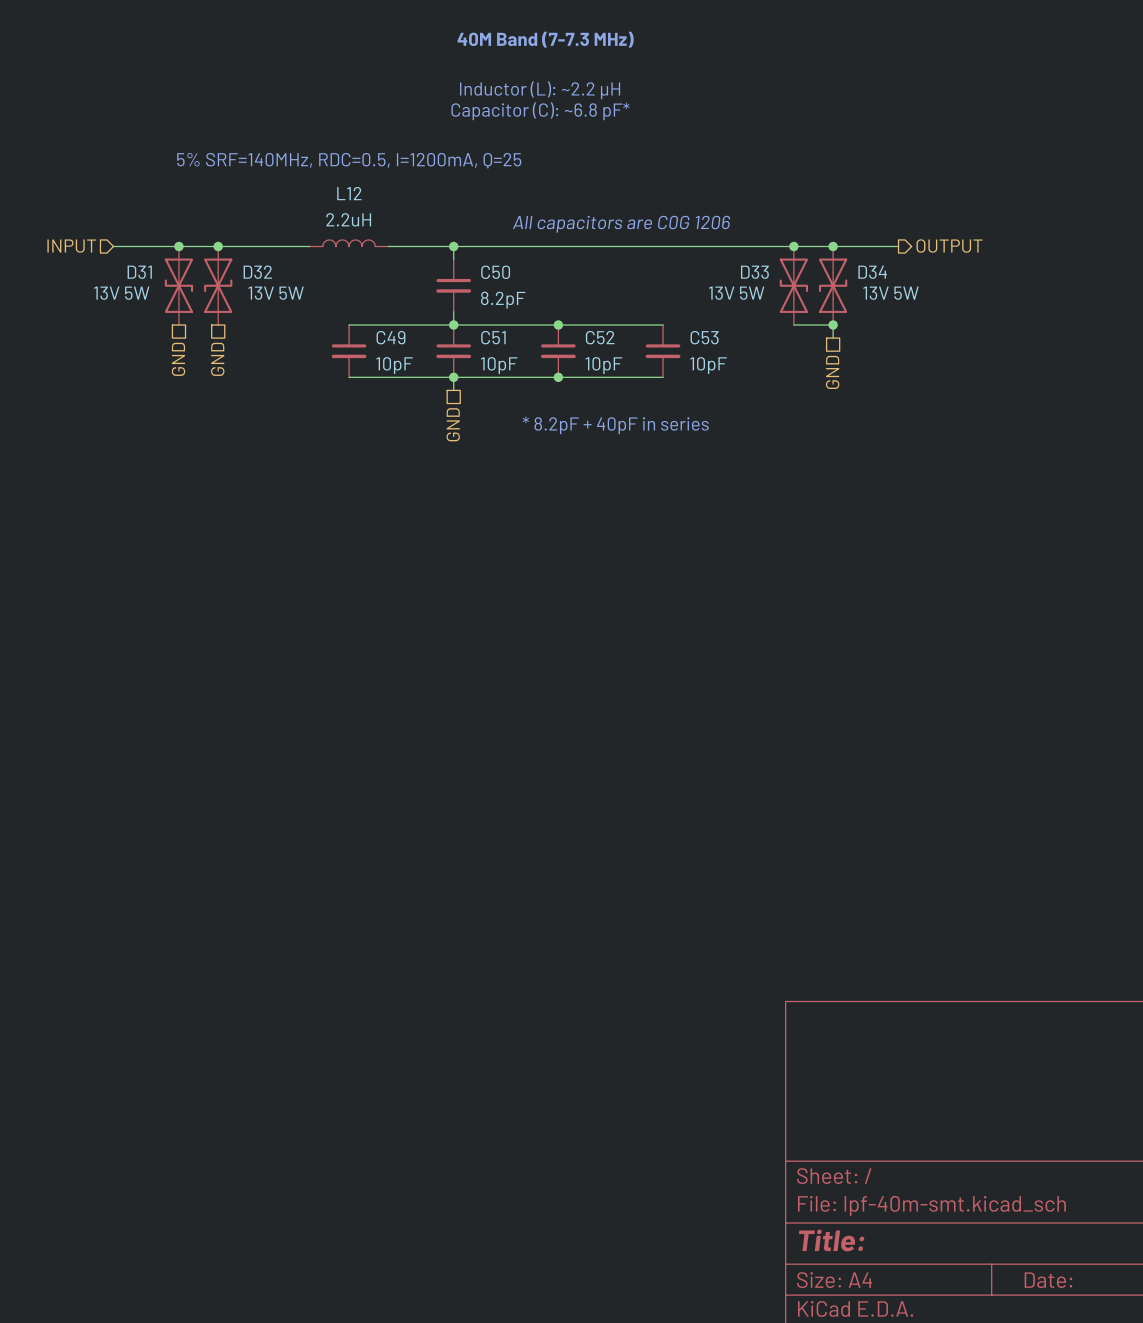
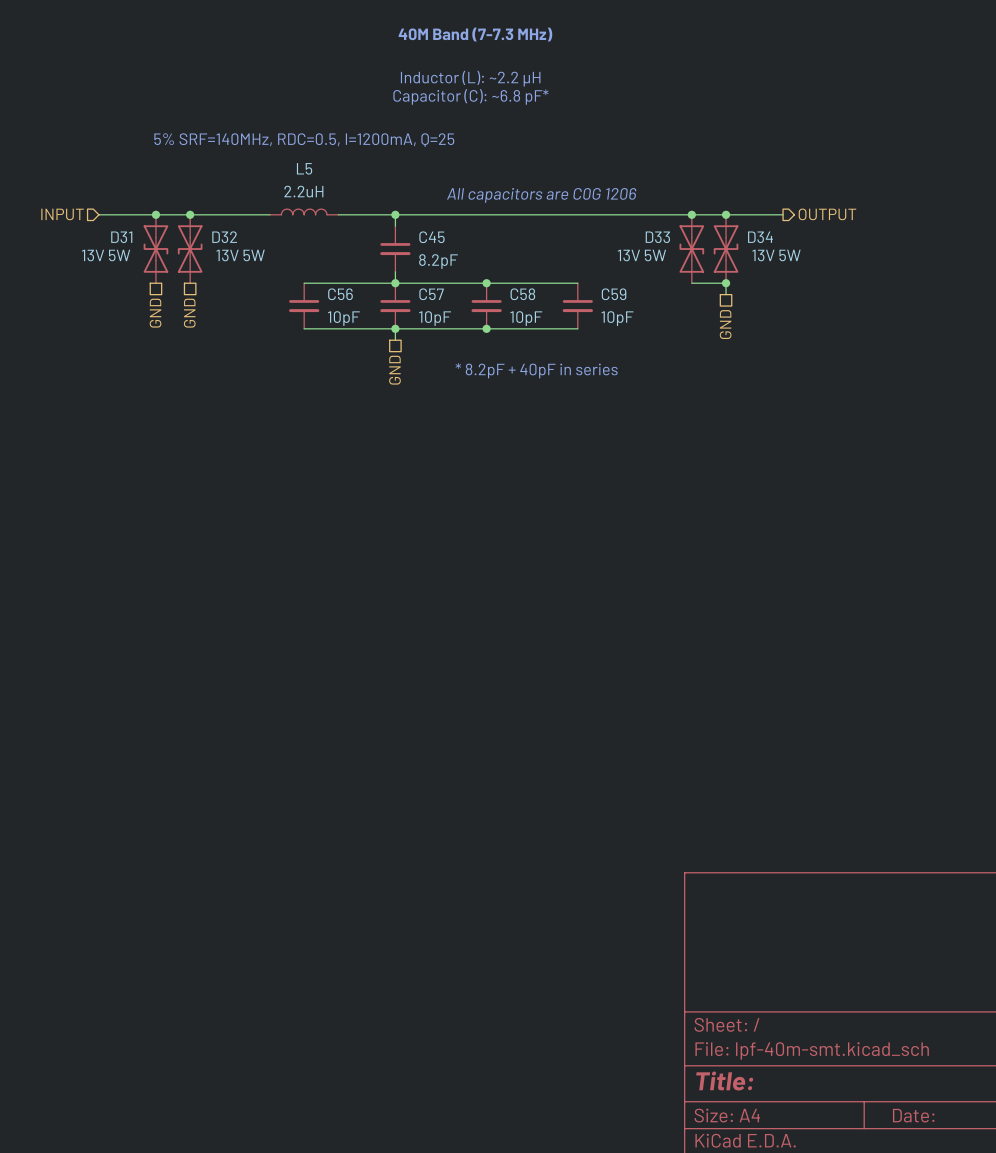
L12 name: L12 (349, 193) -> L5 (304, 168)
C50 name: C50 (495, 272) -> C45 (431, 237)
C49 name: C49 (390, 337) -> C56 (340, 294)
C51 name: C51 (493, 337) -> C57 (431, 294)
C52 name: C52 (600, 337) -> C58 (522, 294)
C53 name: C53 (704, 337) -> C59 (614, 294)

